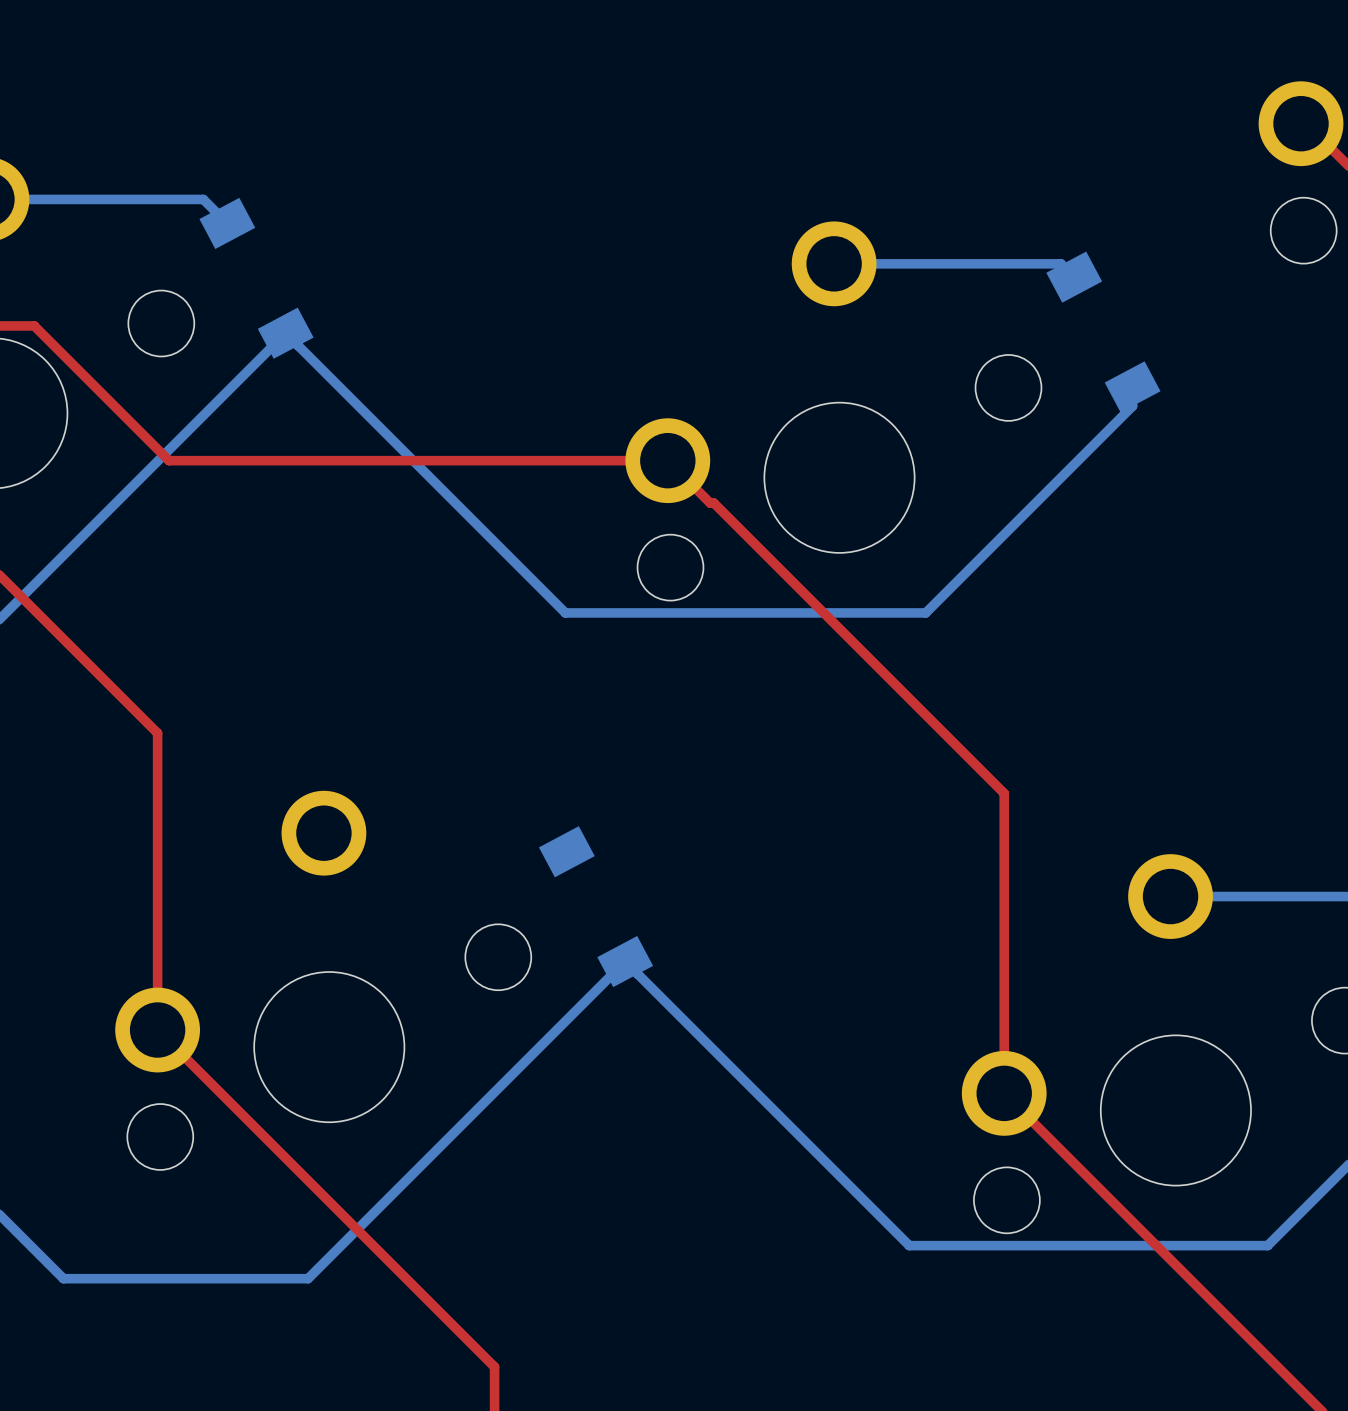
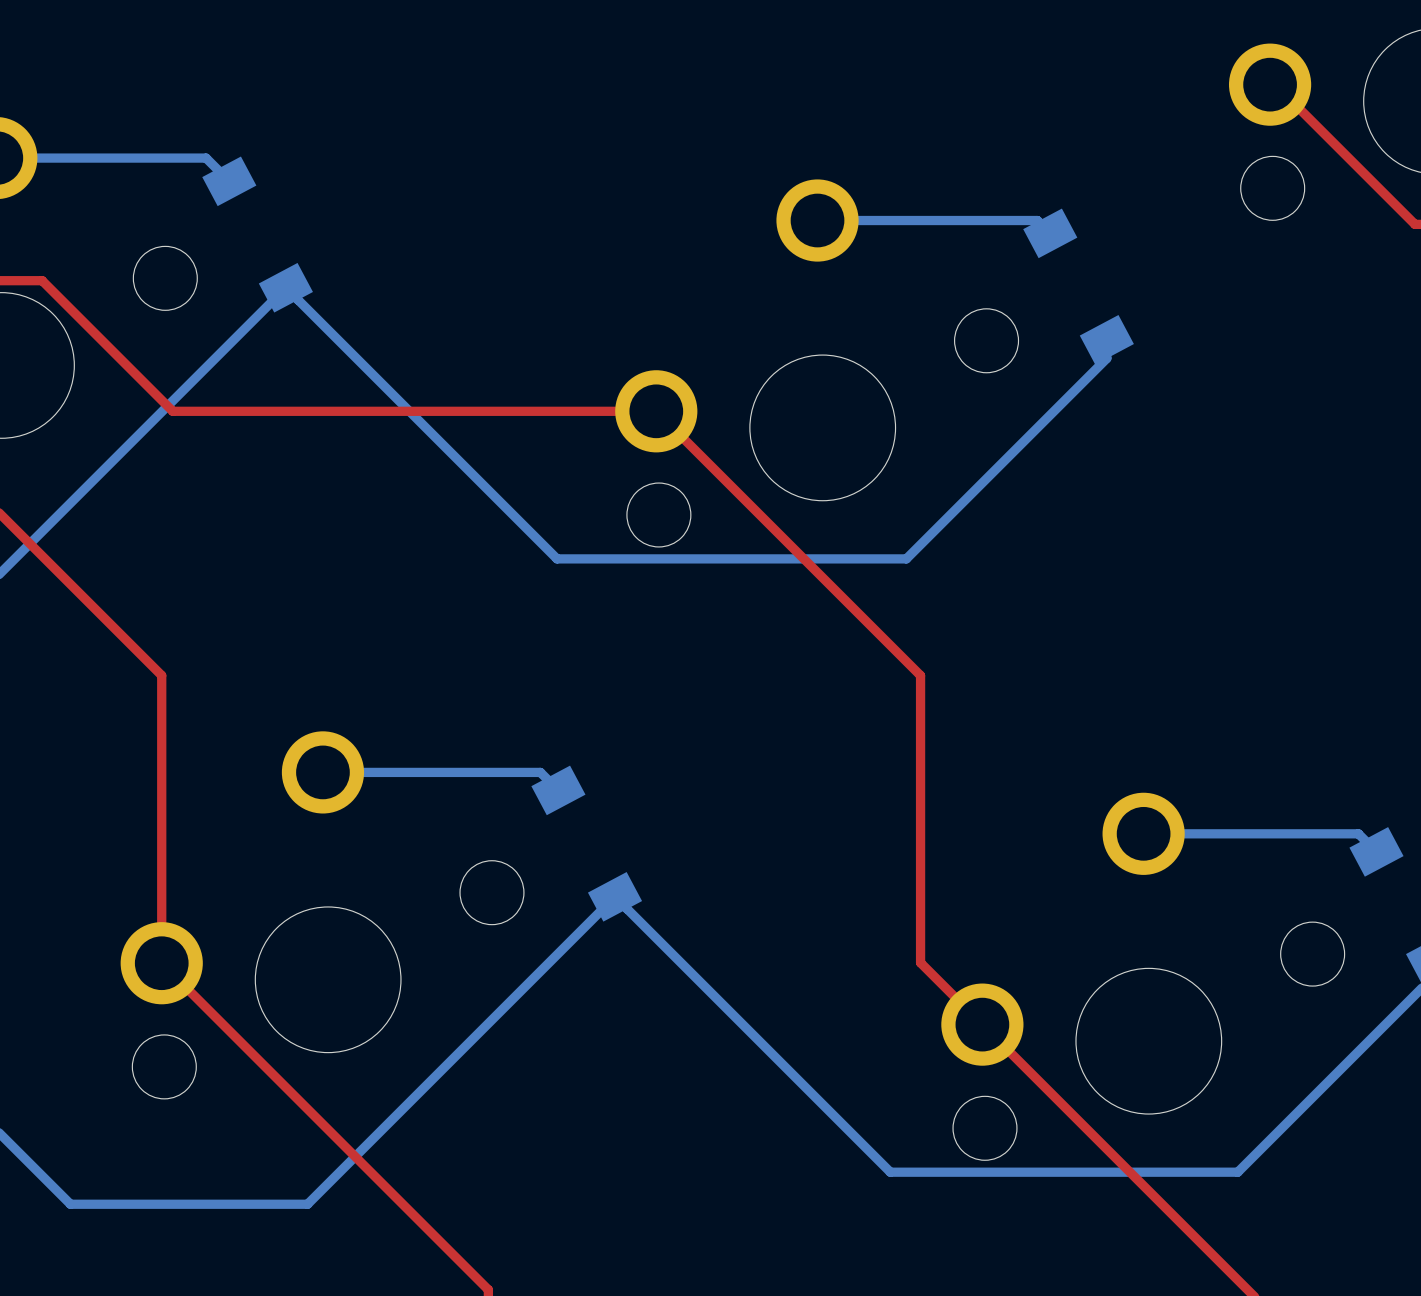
top track: (710, 503) (713, 503) (1004, 793) (1004, 1093) -> (697, 452) (920, 675) (920, 962) (982, 1024)
bottom track: none -> (322, 772) (540, 772) (558, 790)

